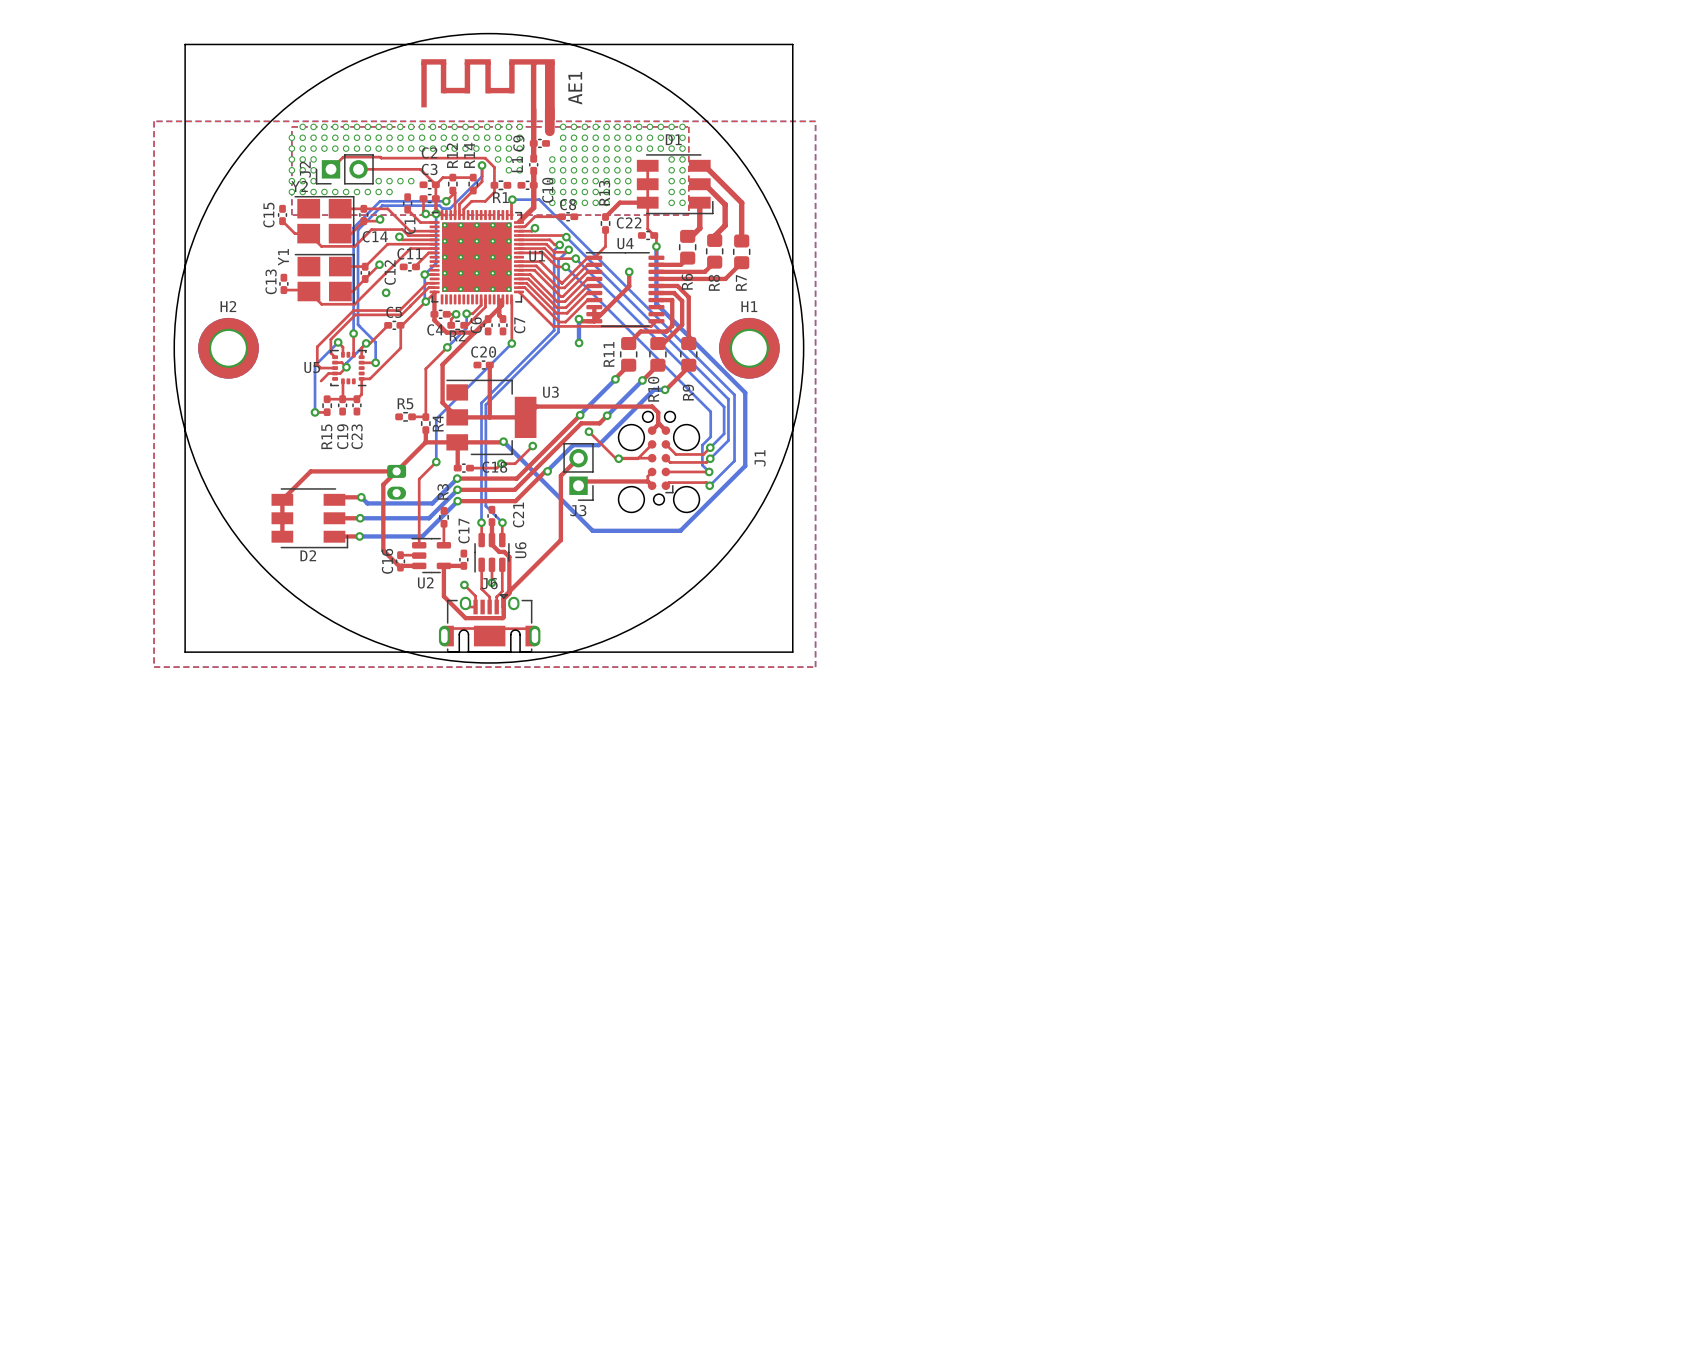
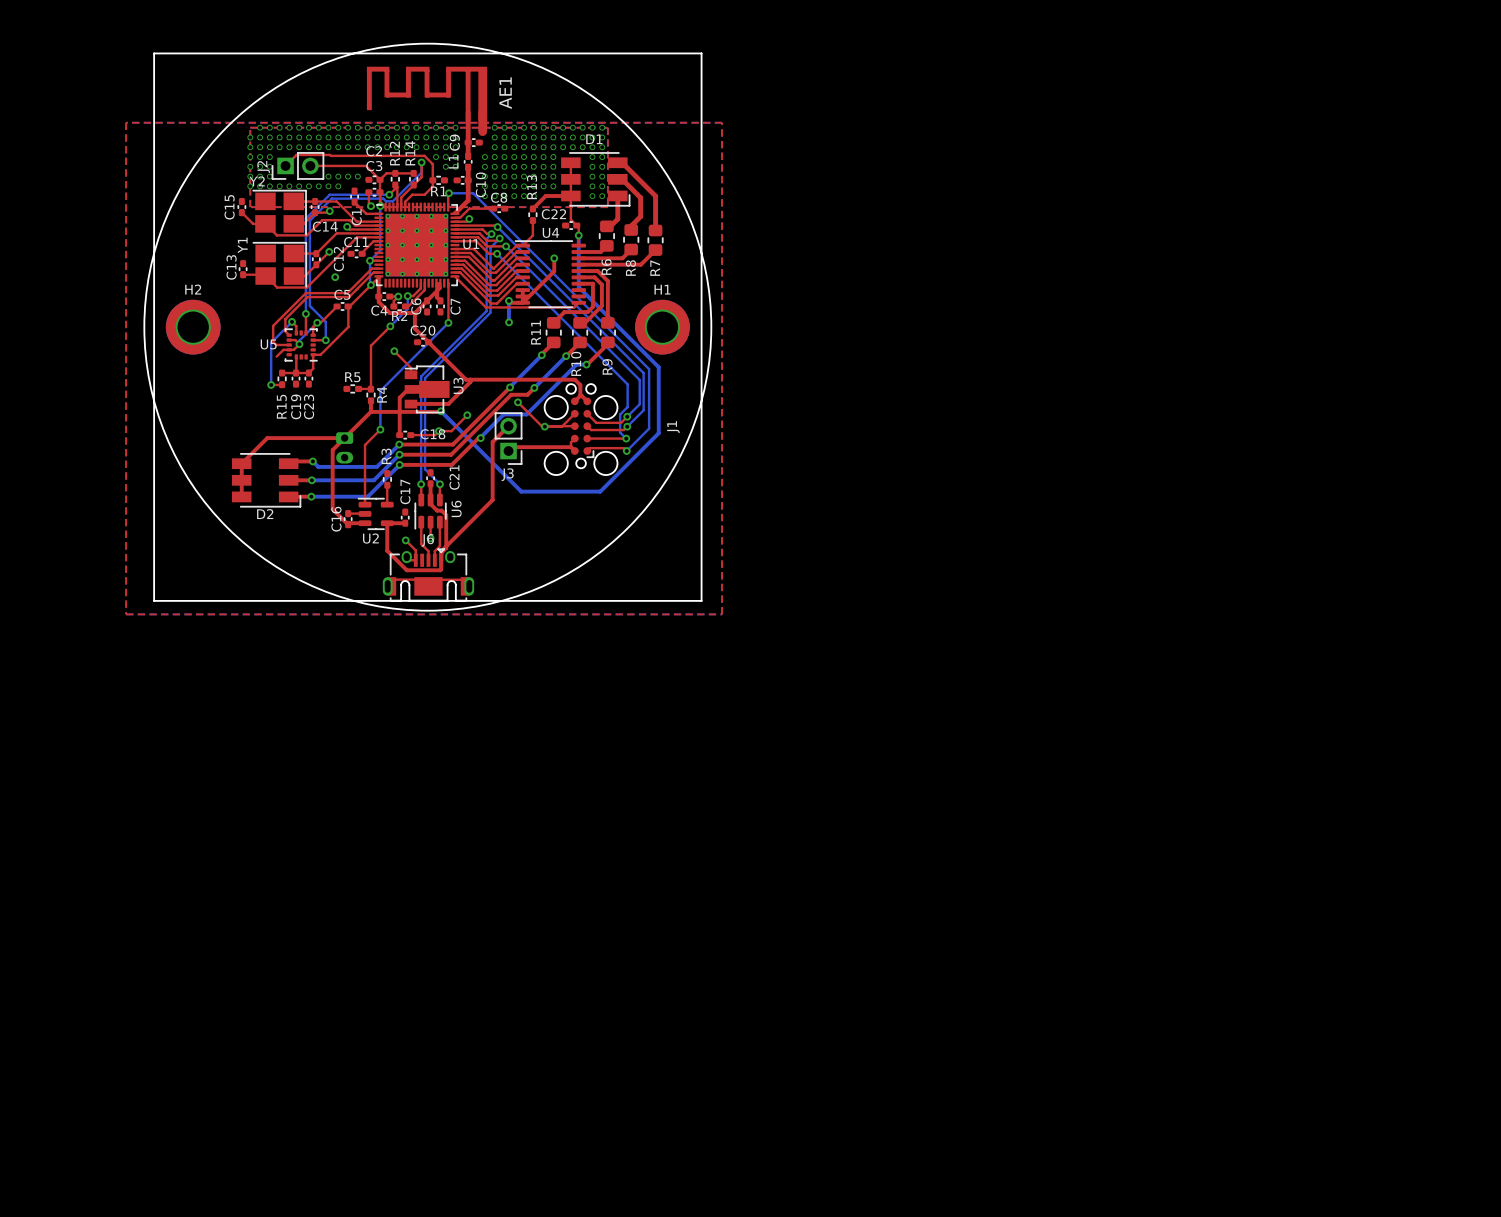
top track: (474, 332) (442, 364) (442, 402) (457, 417) (467, 417) -> (414, 313) (414, 328) (466, 379) (470, 379) (470, 381) (448, 403) (411, 404)
top track: (489, 365) (489, 417) -> none
top track: none -> (394, 351) (411, 367) (411, 374)
via: none -> (394, 351)
U3 footprint: [446, 379, 537, 456] -> [404, 365, 450, 414]
U3 name position: U3 (550, 392) -> U3 (458, 385)
top track: (536, 406) (525, 417) (471, 417) -> none
top track: none -> (408, 389) (399, 397) (399, 412)

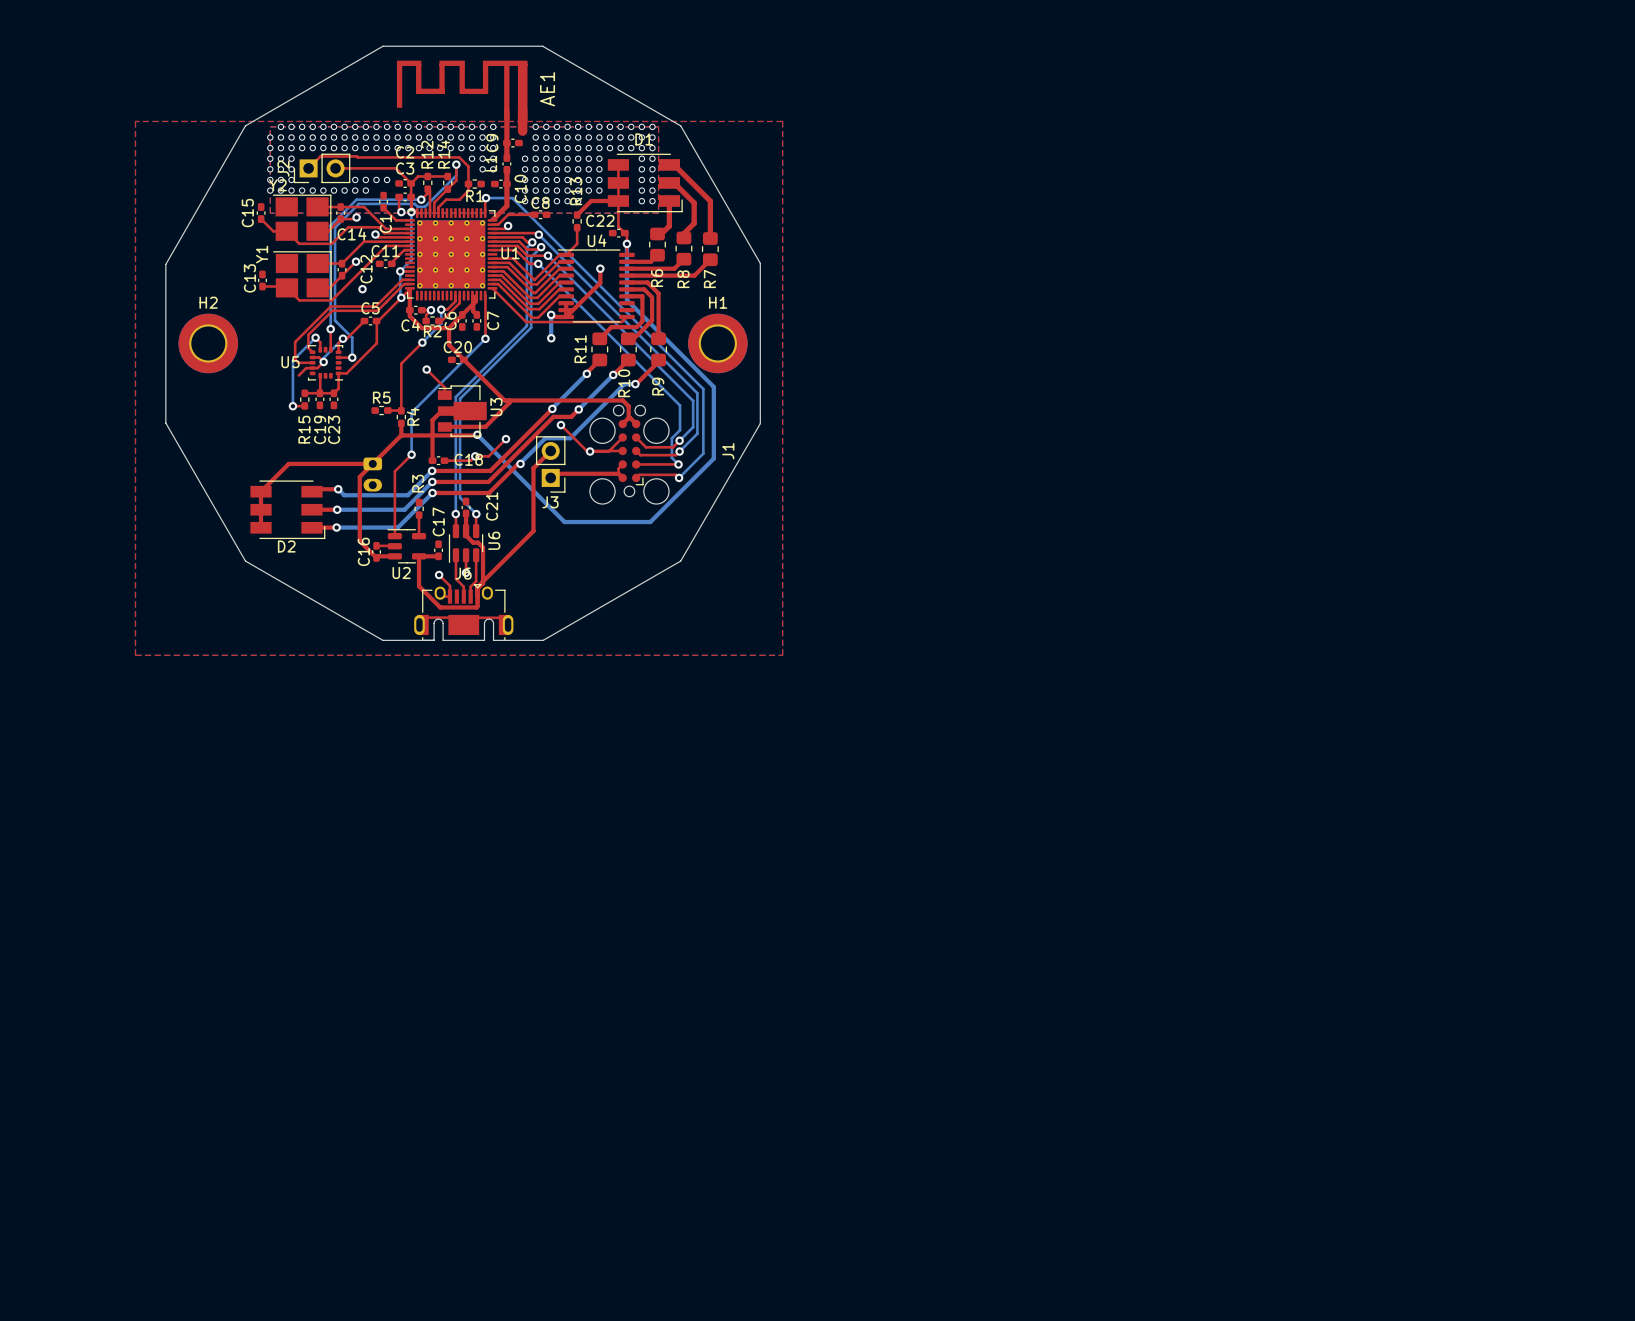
round board edge: [143, 43, 712, 612] -> none
board edge: (354, 53) (154, 53) (154, 254) -> (382, 46) (245, 125) (165, 264)
board edge: (501, 53) (701, 53) (701, 253) -> (542, 46) (680, 125) (760, 263)
board edge: (154, 400) (154, 600) (701, 600) (701, 400) -> (165, 423) (245, 561) (382, 640) (434, 640)
board edge: none -> (760, 423) (680, 561) (543, 640) (503, 640)

